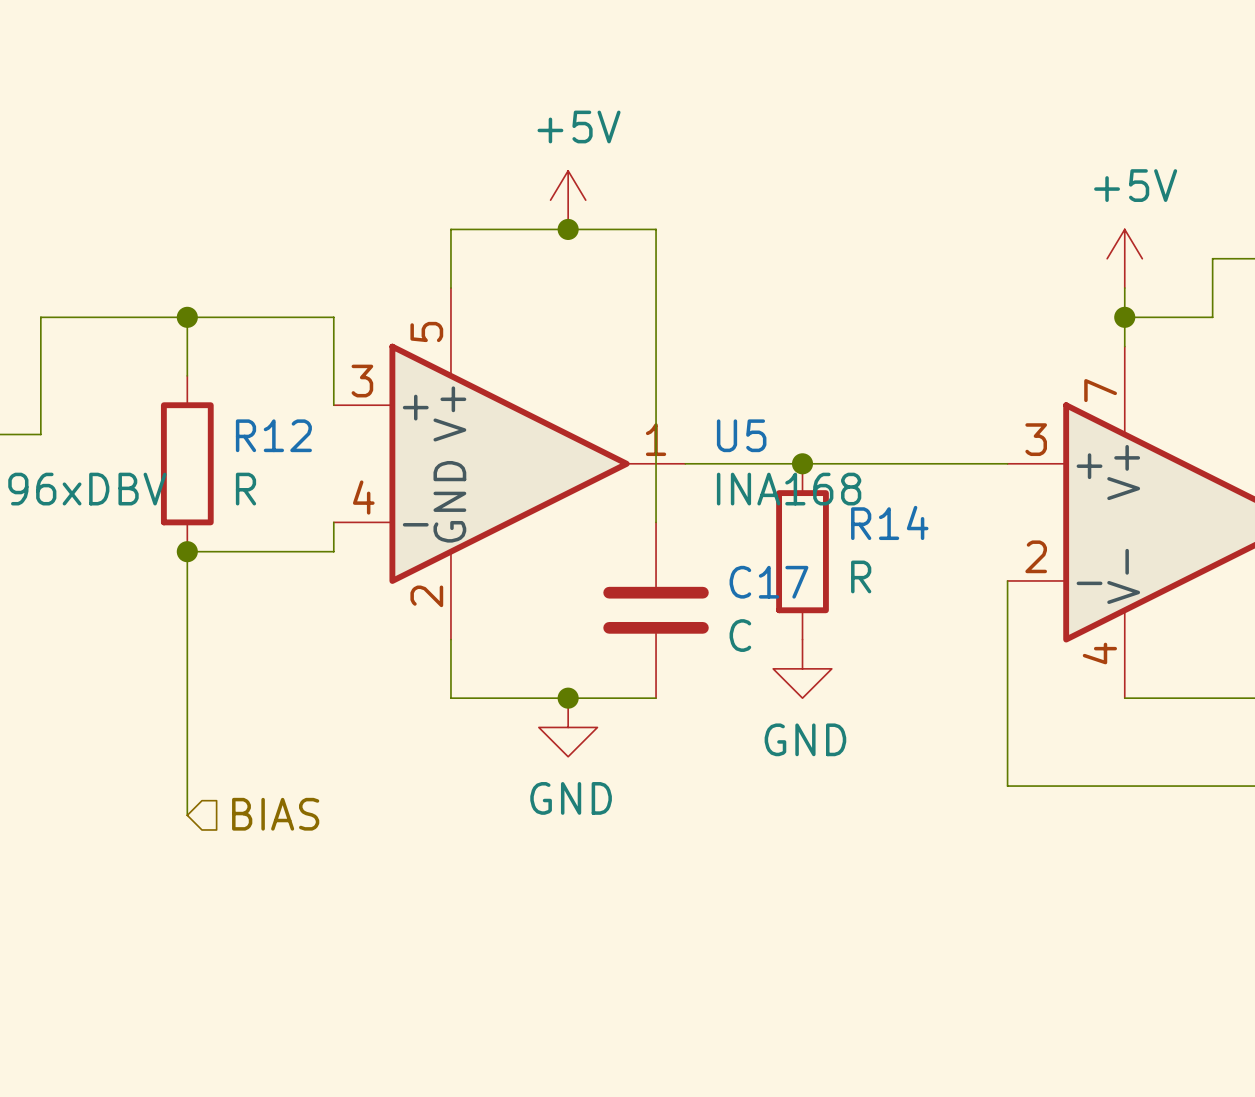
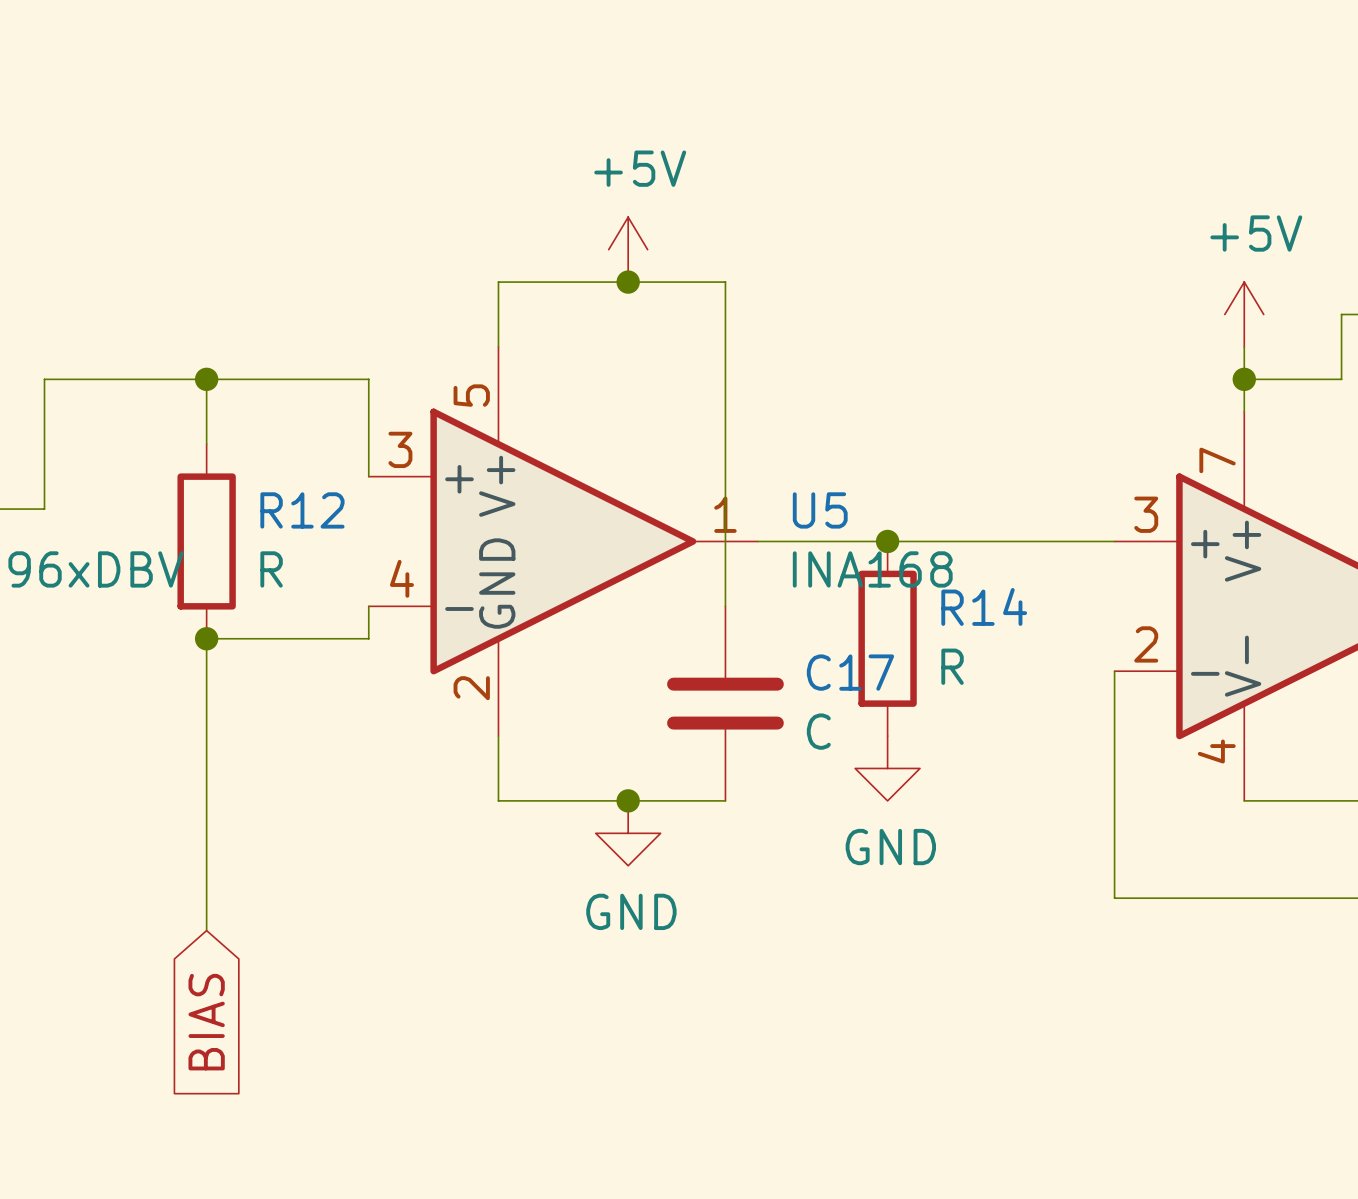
hierarchical label: BIAS (275, 814) -> none
global label: none -> BIAS (206, 1022)

